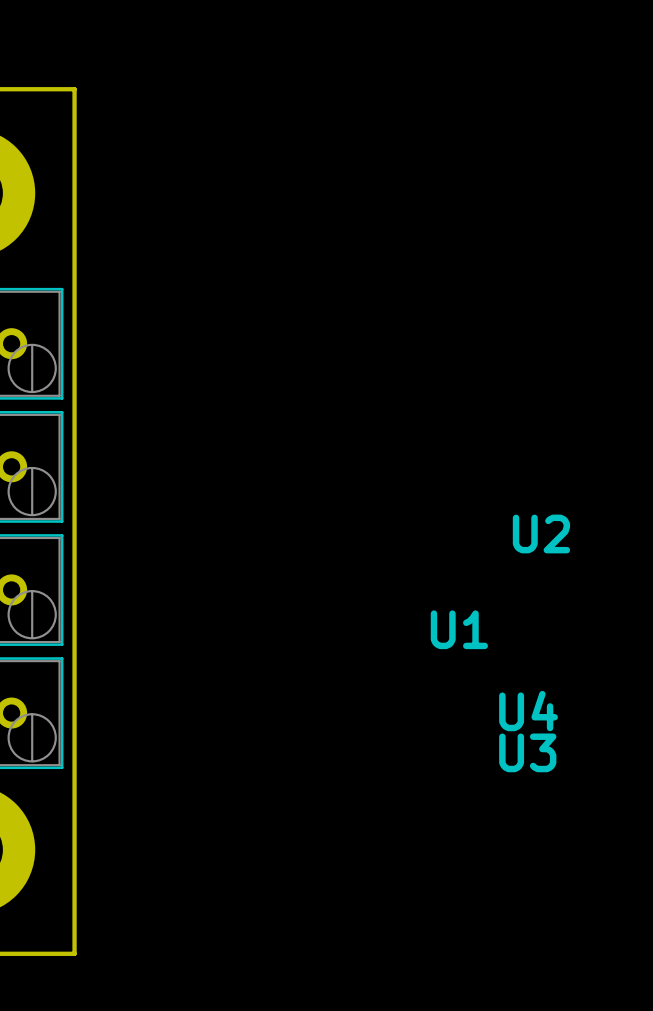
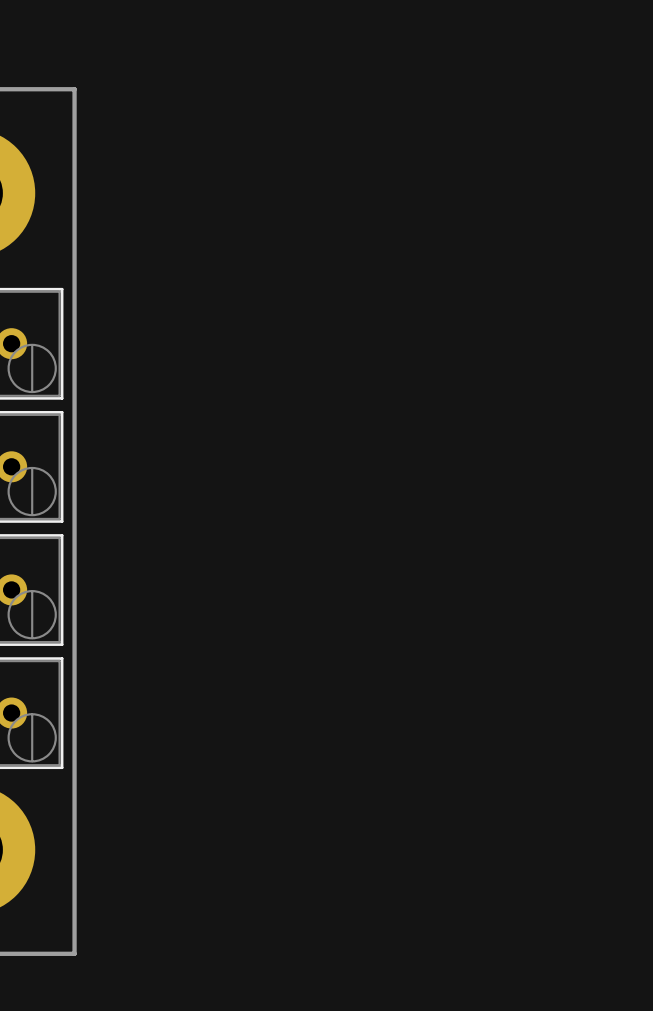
text: U2 (541, 533) -> none
text: U1 (459, 629) -> none
text: U4 (528, 711) -> none
text: U3 (527, 752) -> none

